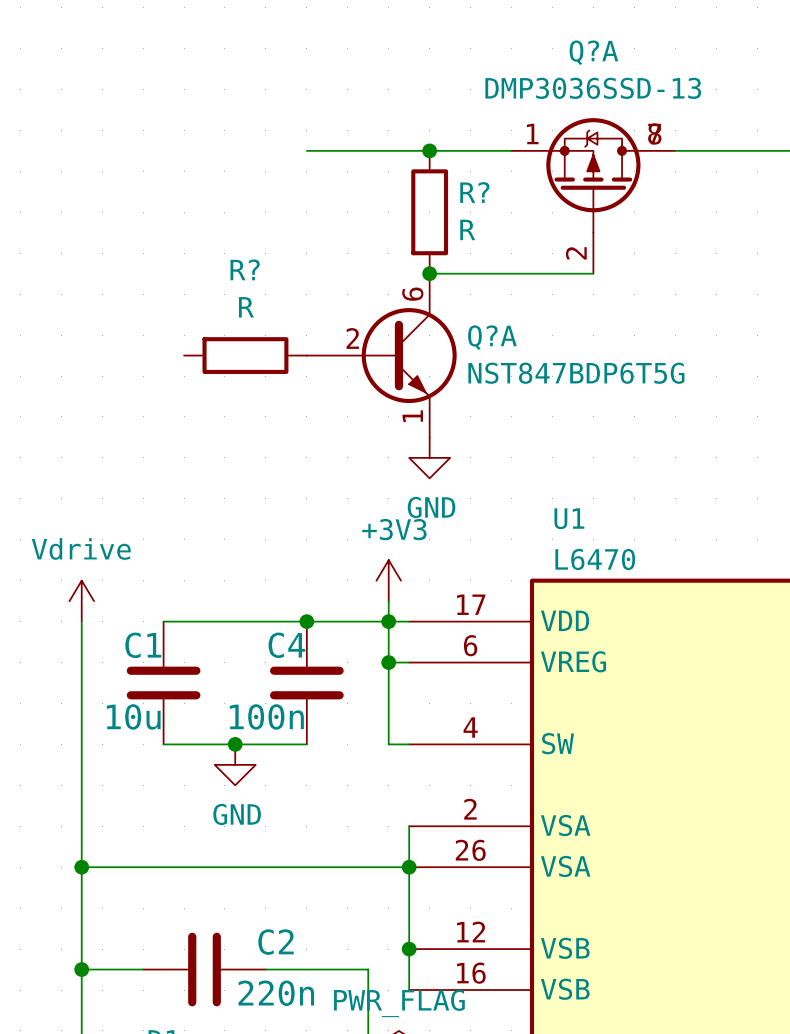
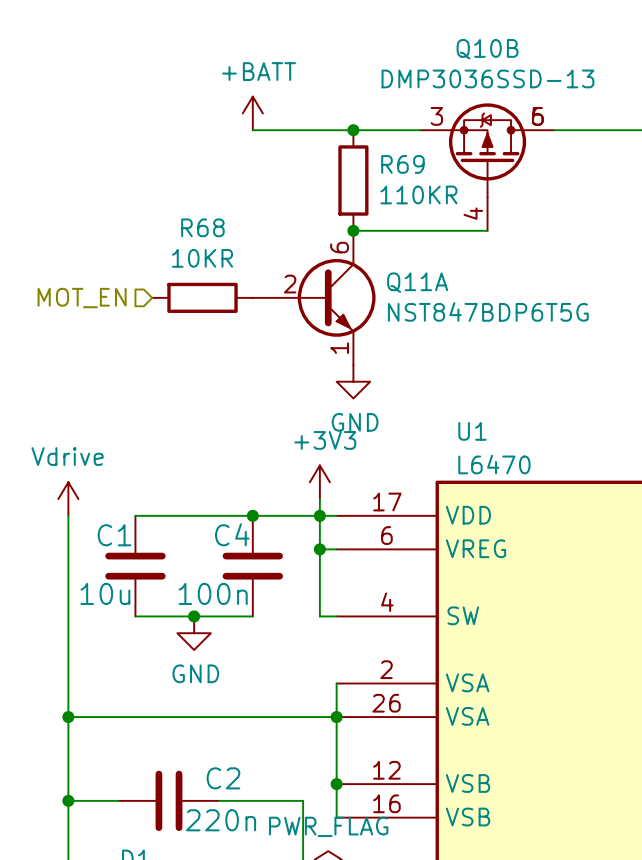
Q?A name: Q?A (593, 52) -> Q10B (487, 49)
Q?A symbol: [511, 118, 676, 274] -> [420, 103, 555, 231]
power symbol: none -> +BATT (252, 113)
R? name: R? (474, 192) -> R69 (402, 164)
R? value: R (467, 229) -> 110KR (418, 194)
R? name: R? (245, 269) -> R68 (202, 227)
R? value: R (246, 307) -> 10KR (202, 258)
Q?A name: Q?A (492, 337) -> Q11A (417, 282)
hierarchical label: none -> MOT_EN (82, 298)

